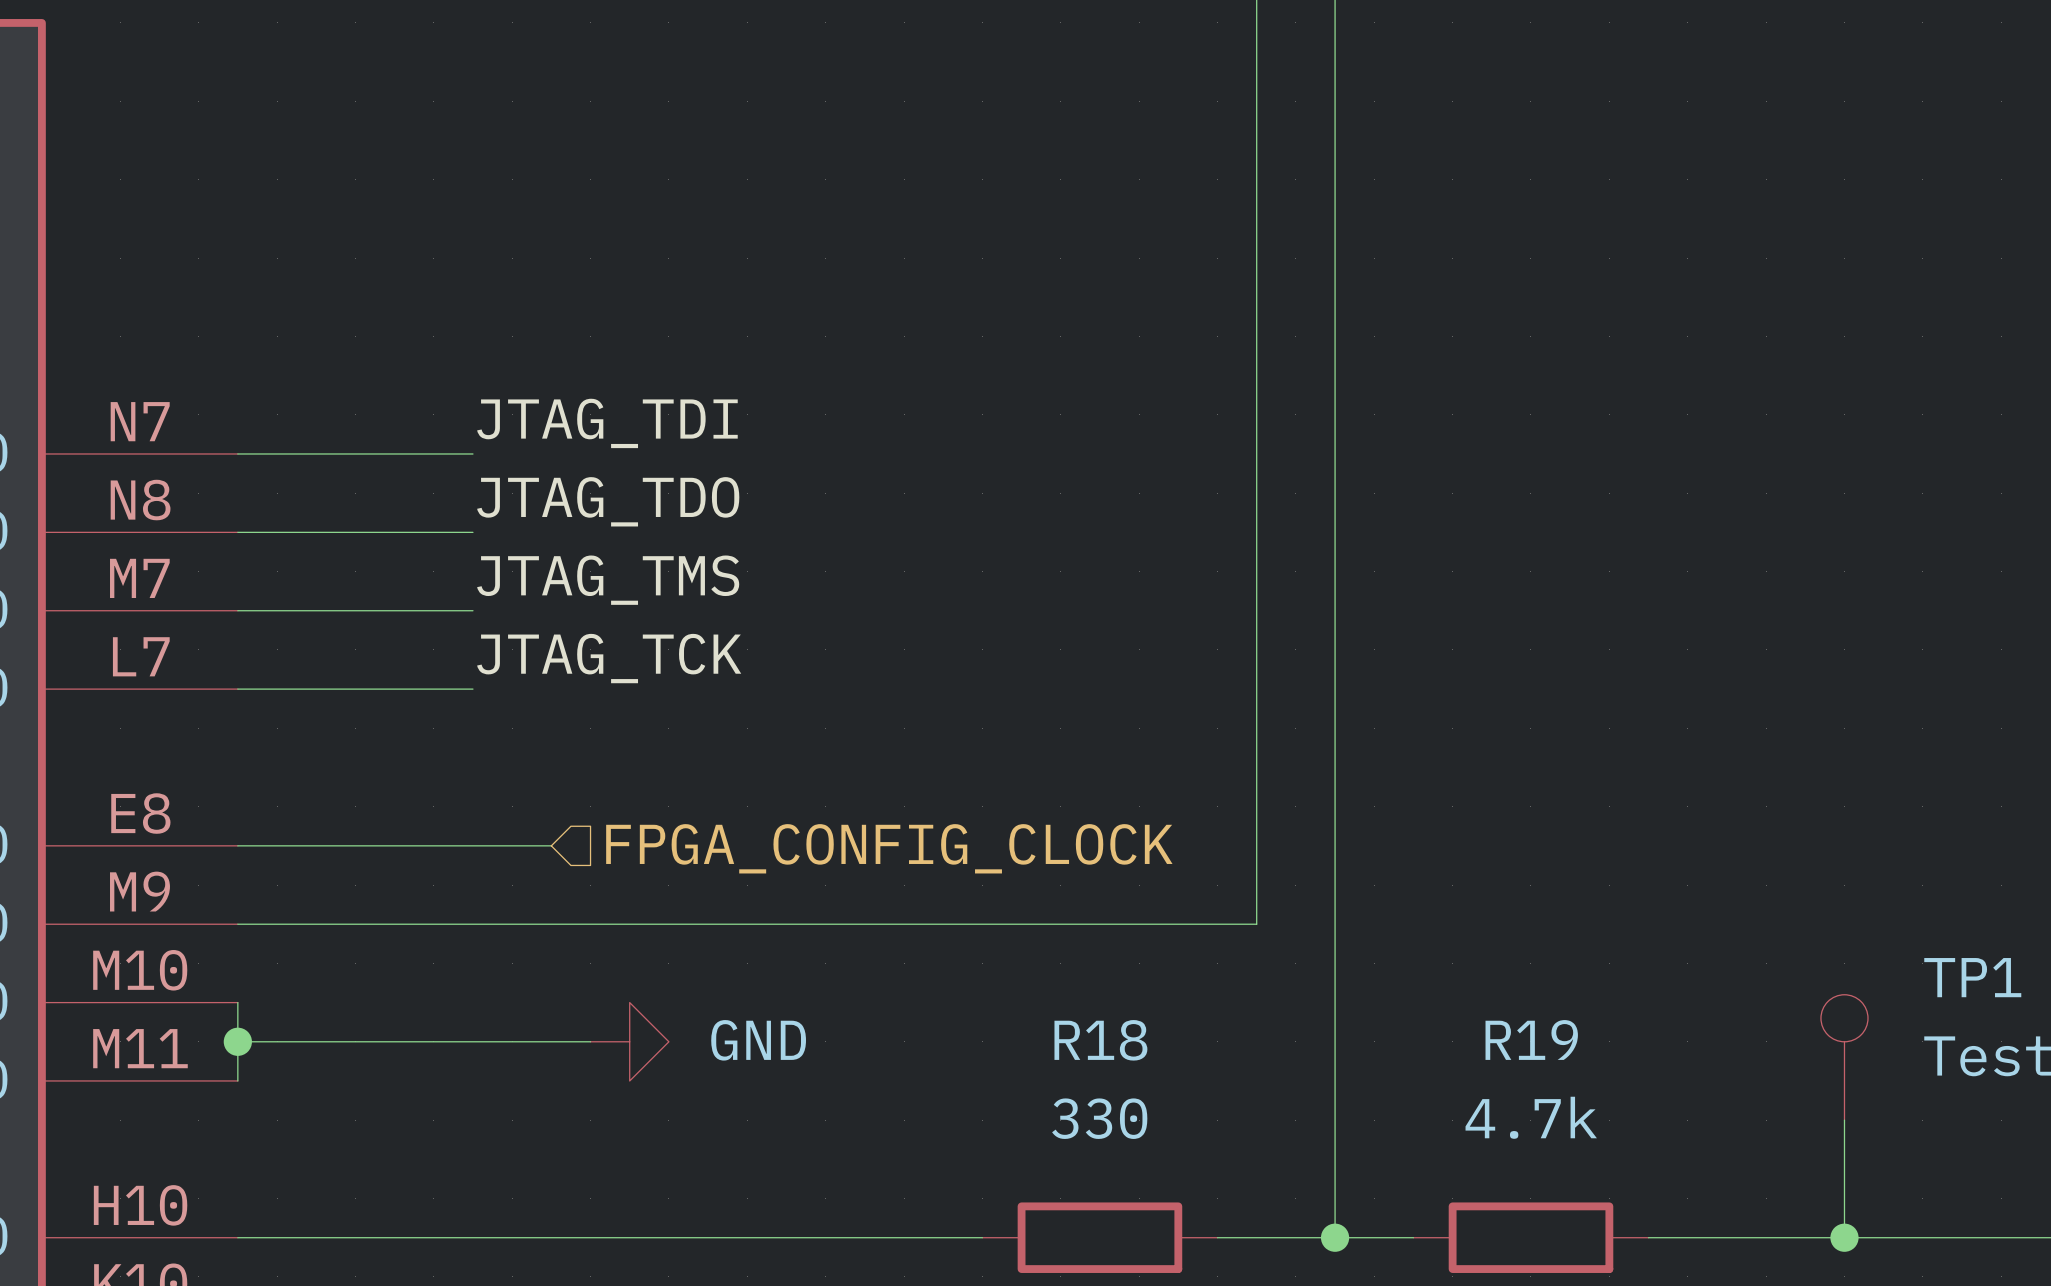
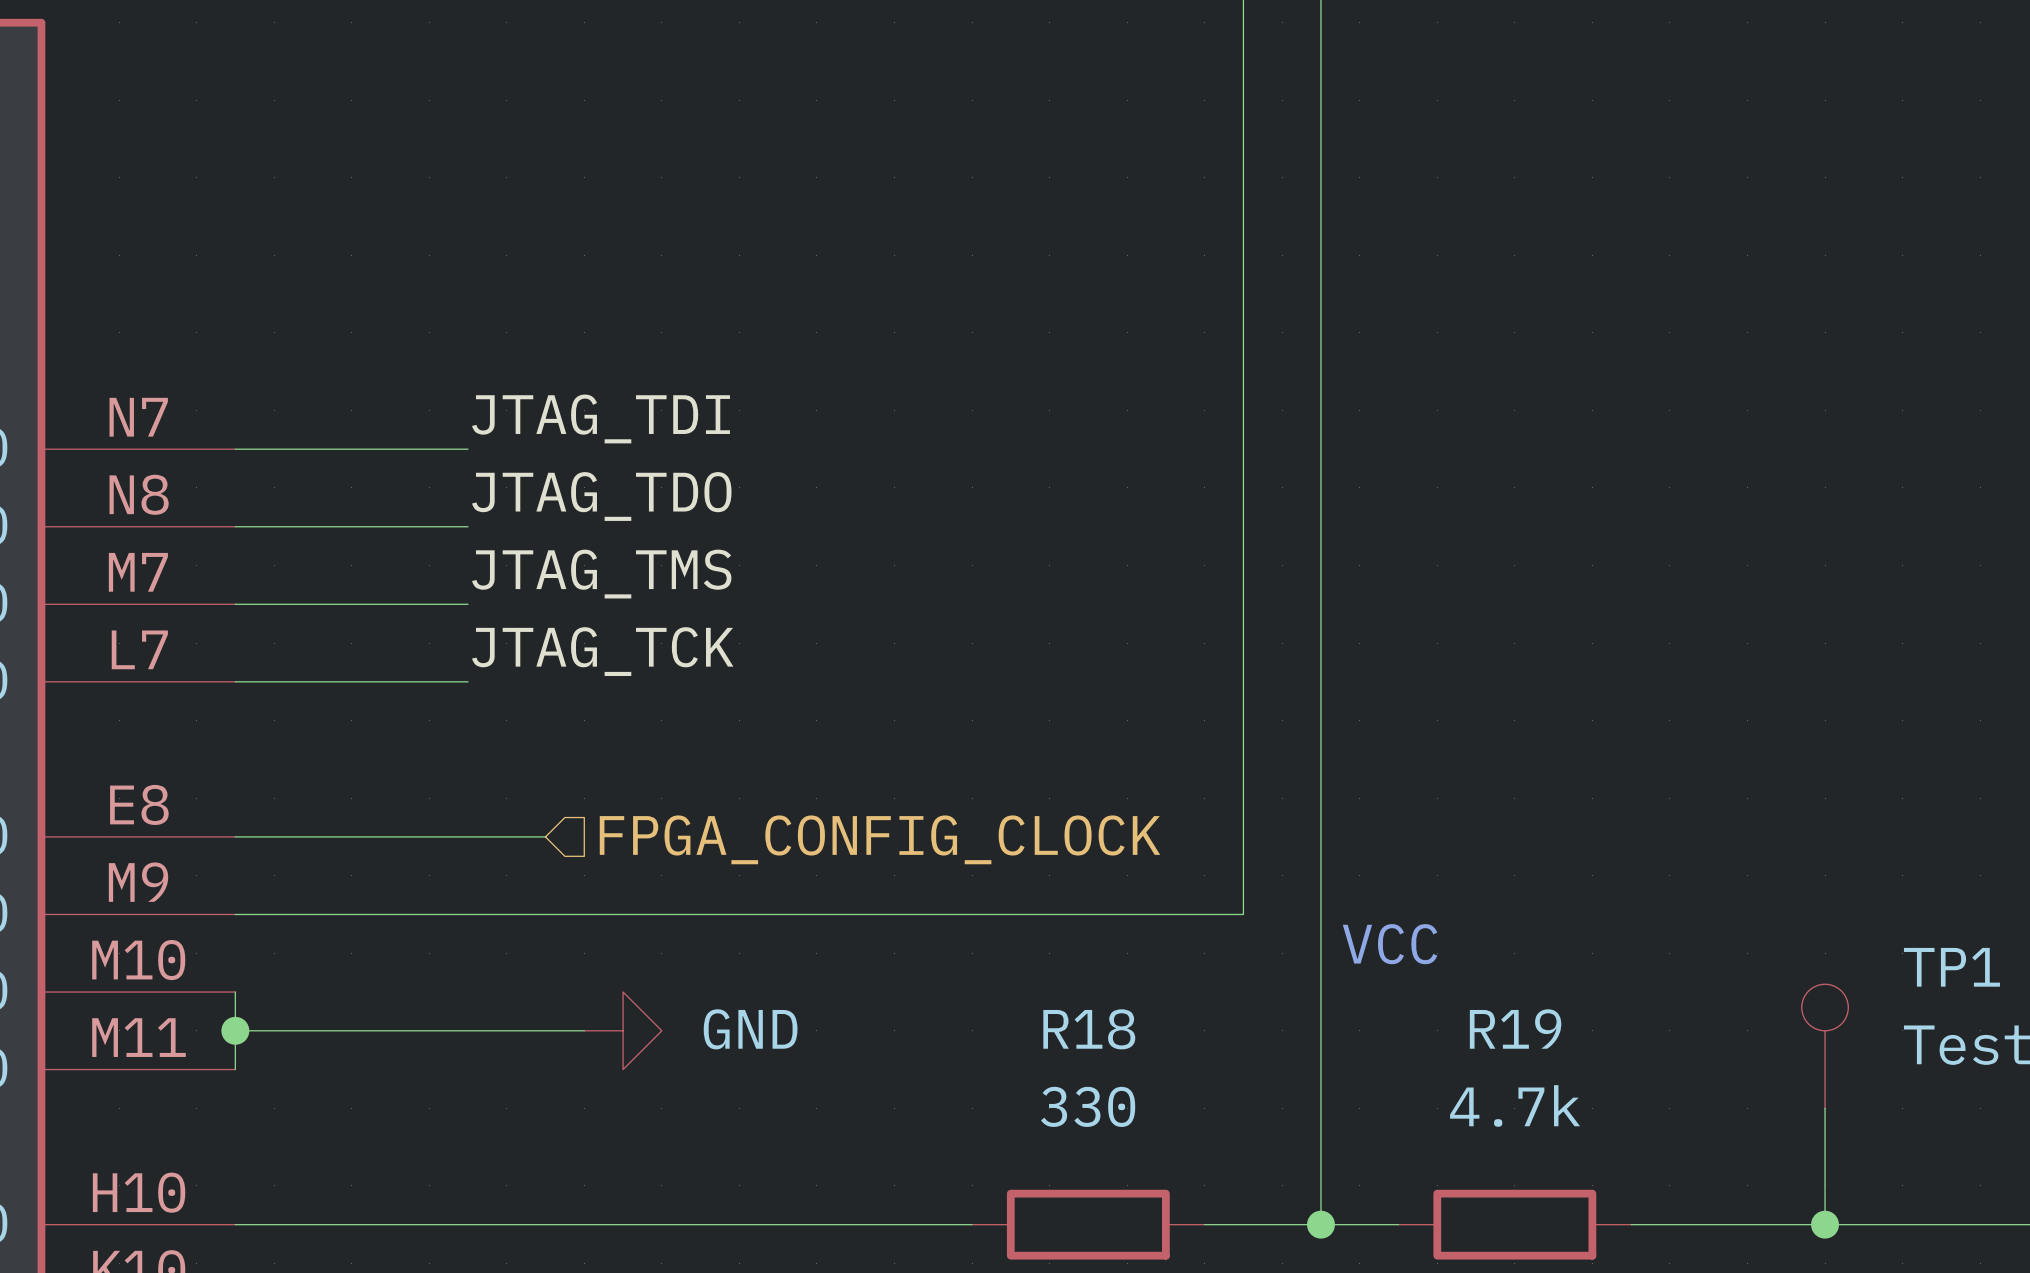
text: none -> VCC (1390, 944)

